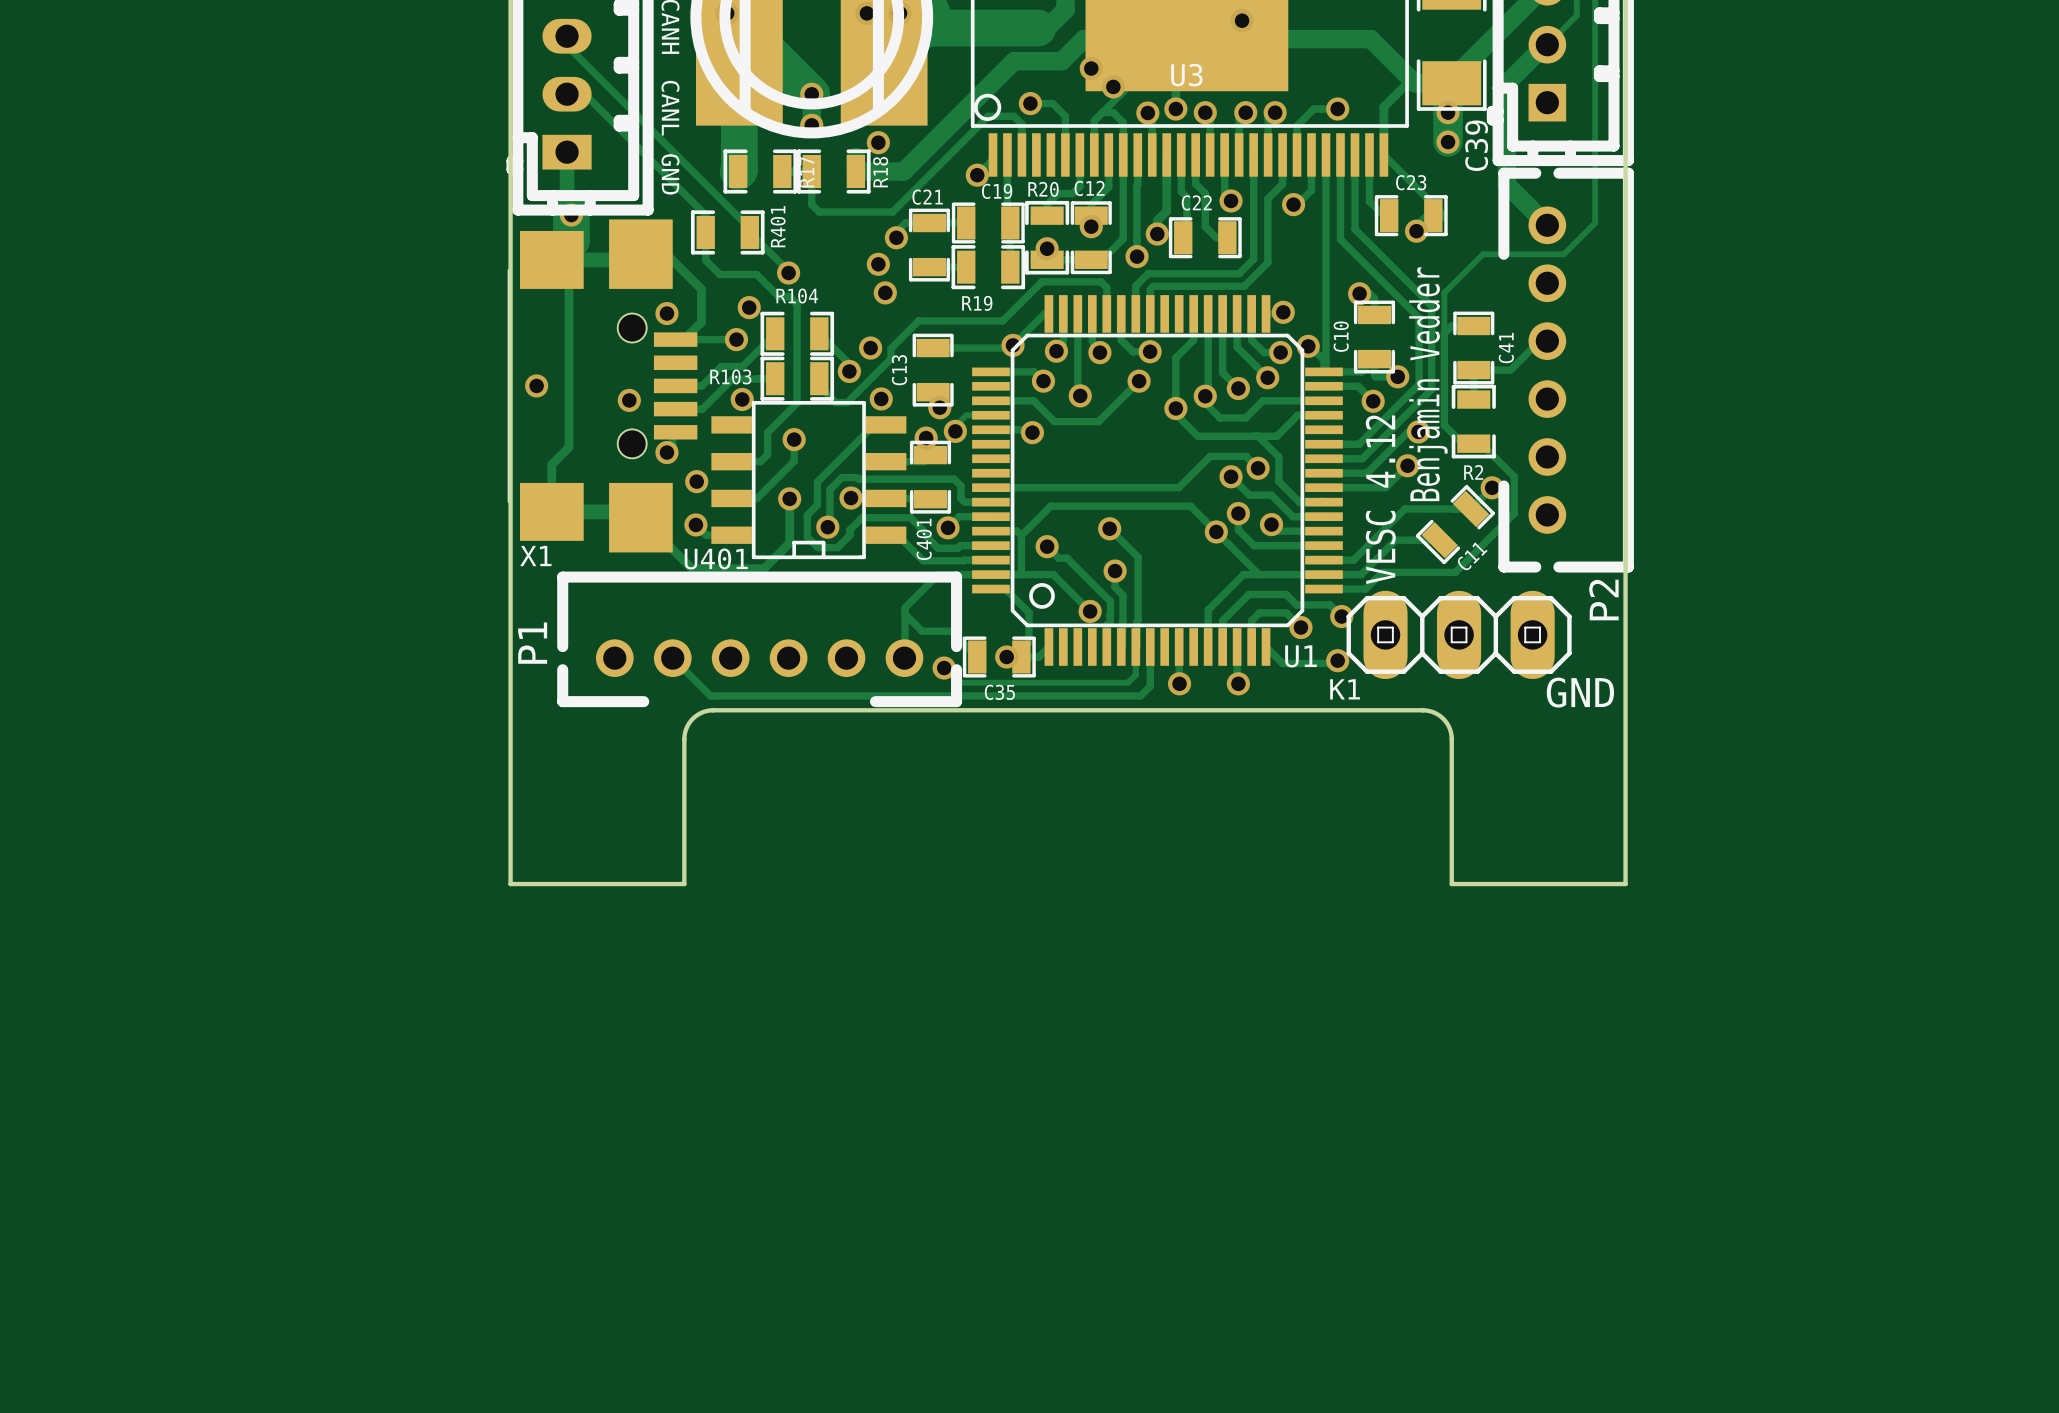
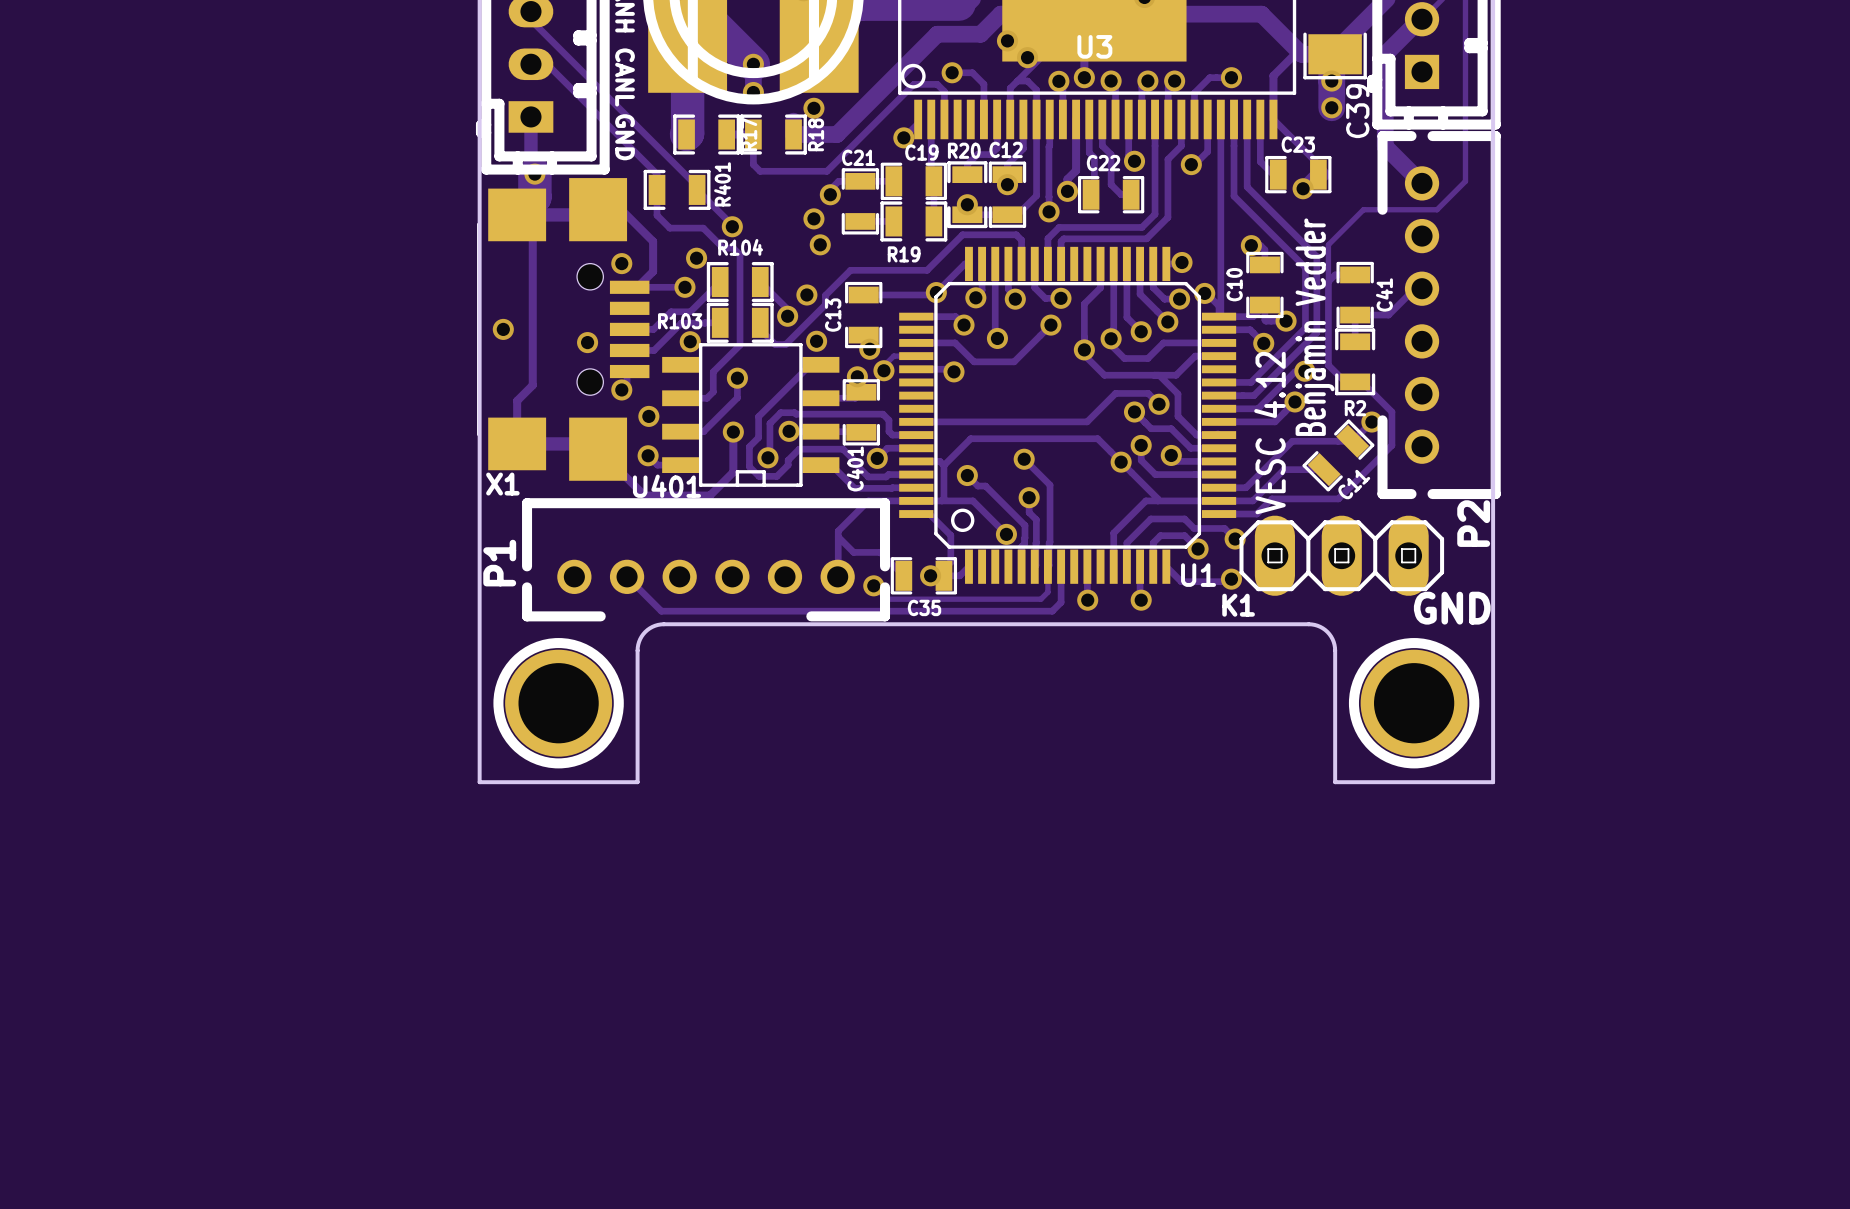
part: none -> (558, 703)
part: none -> (1414, 703)

